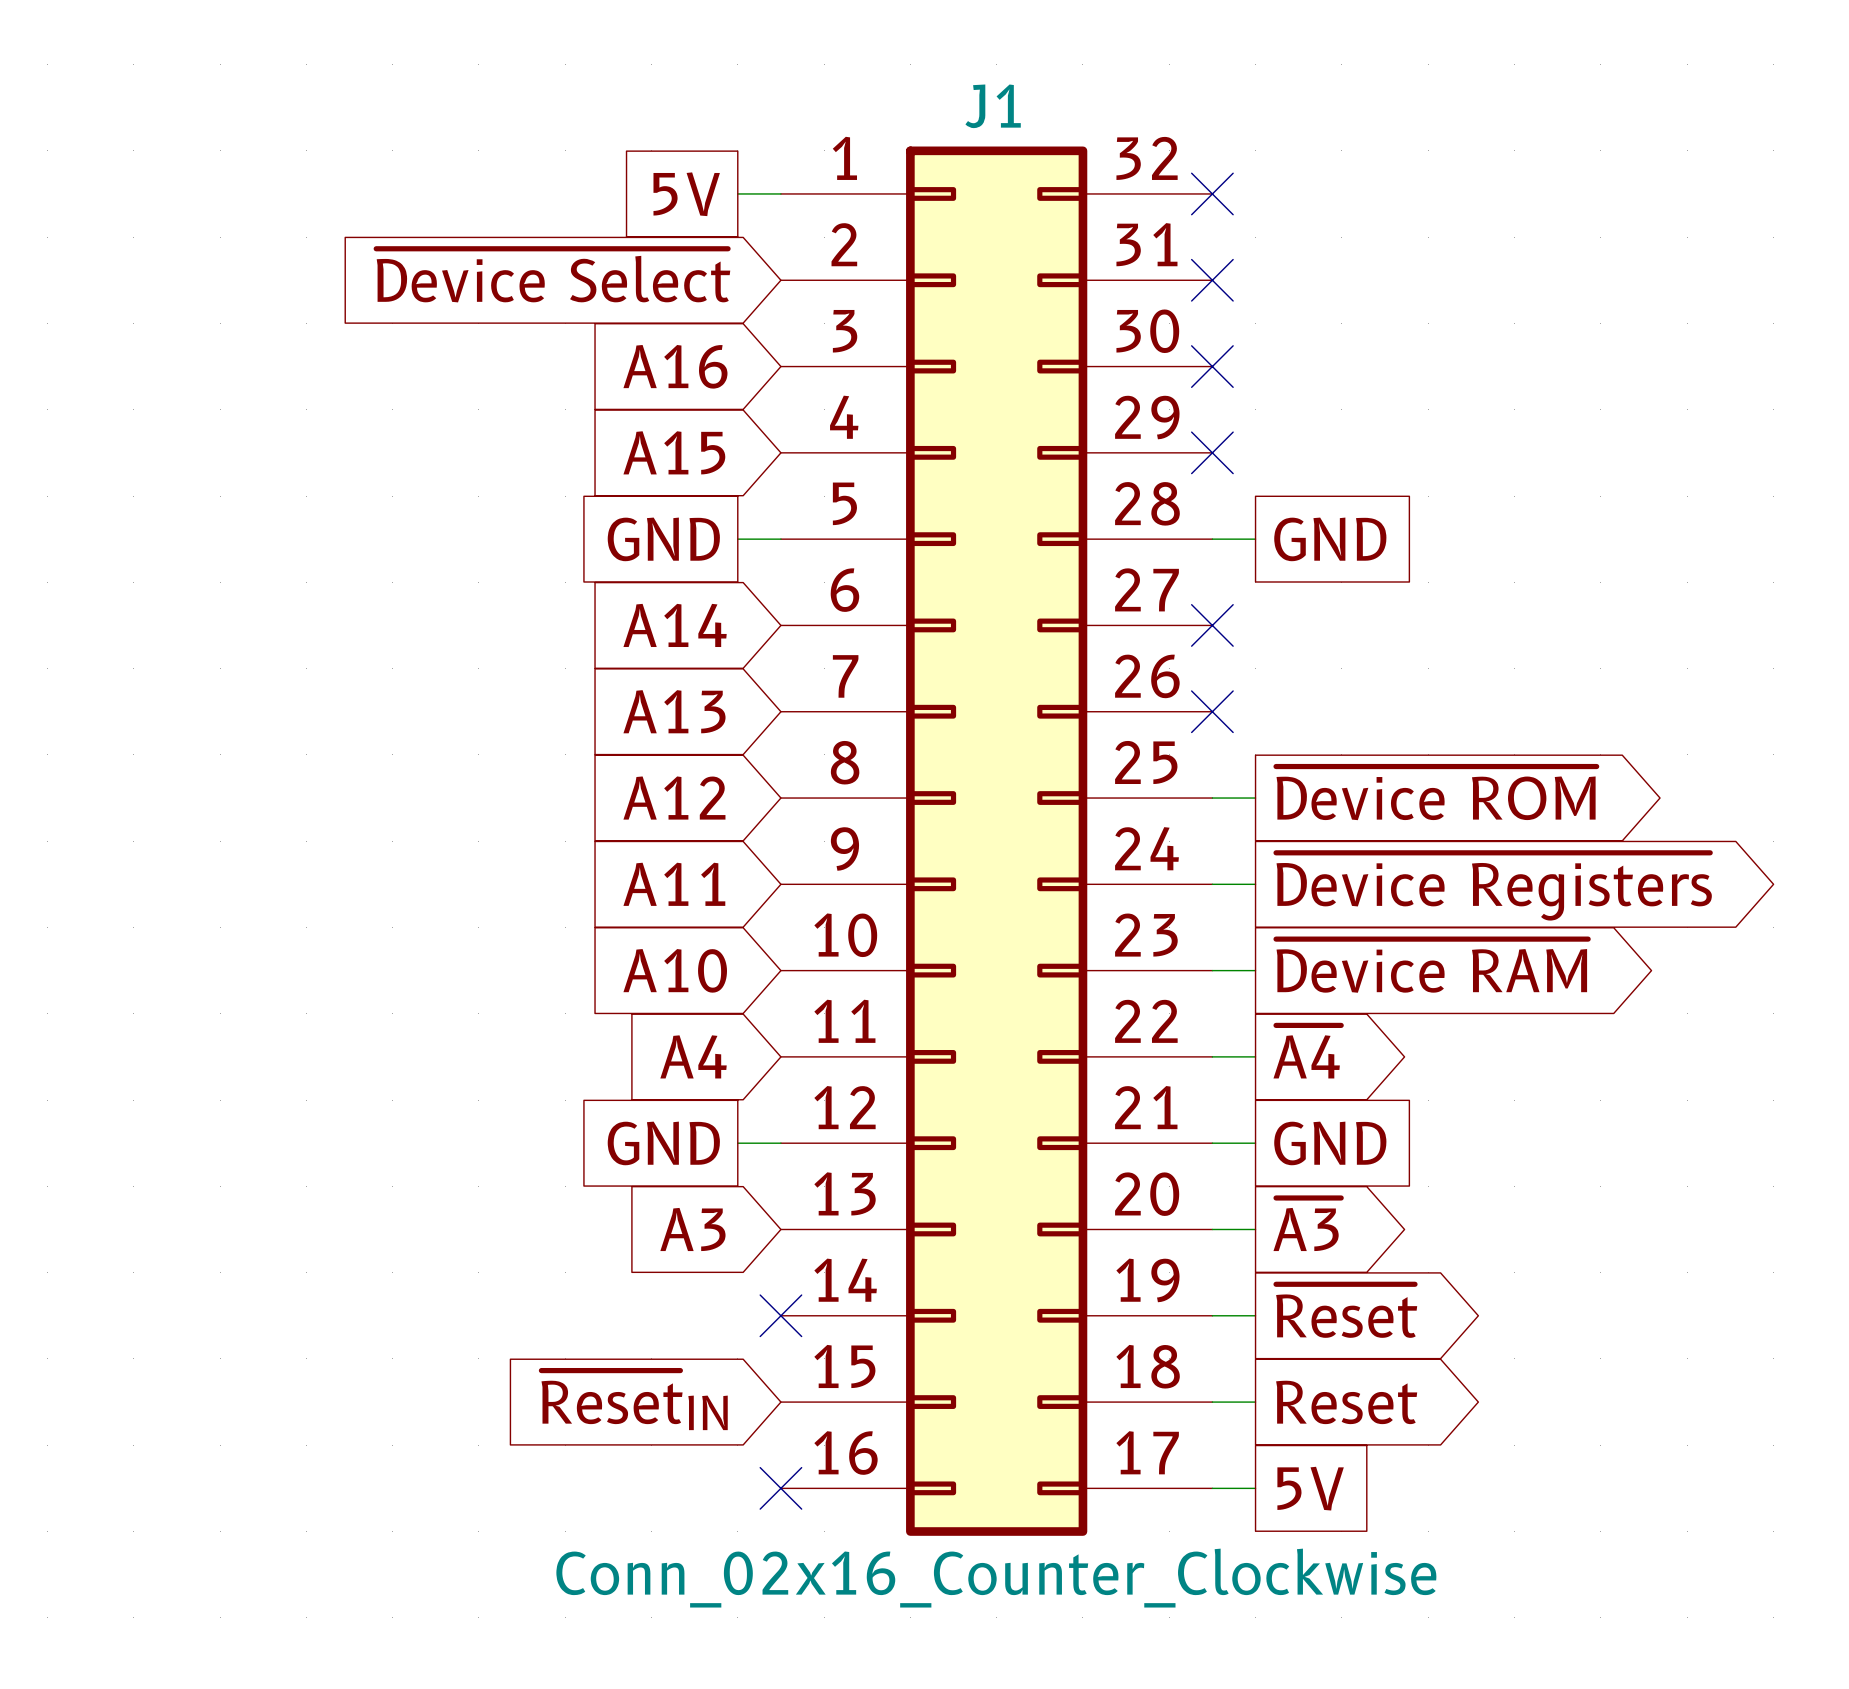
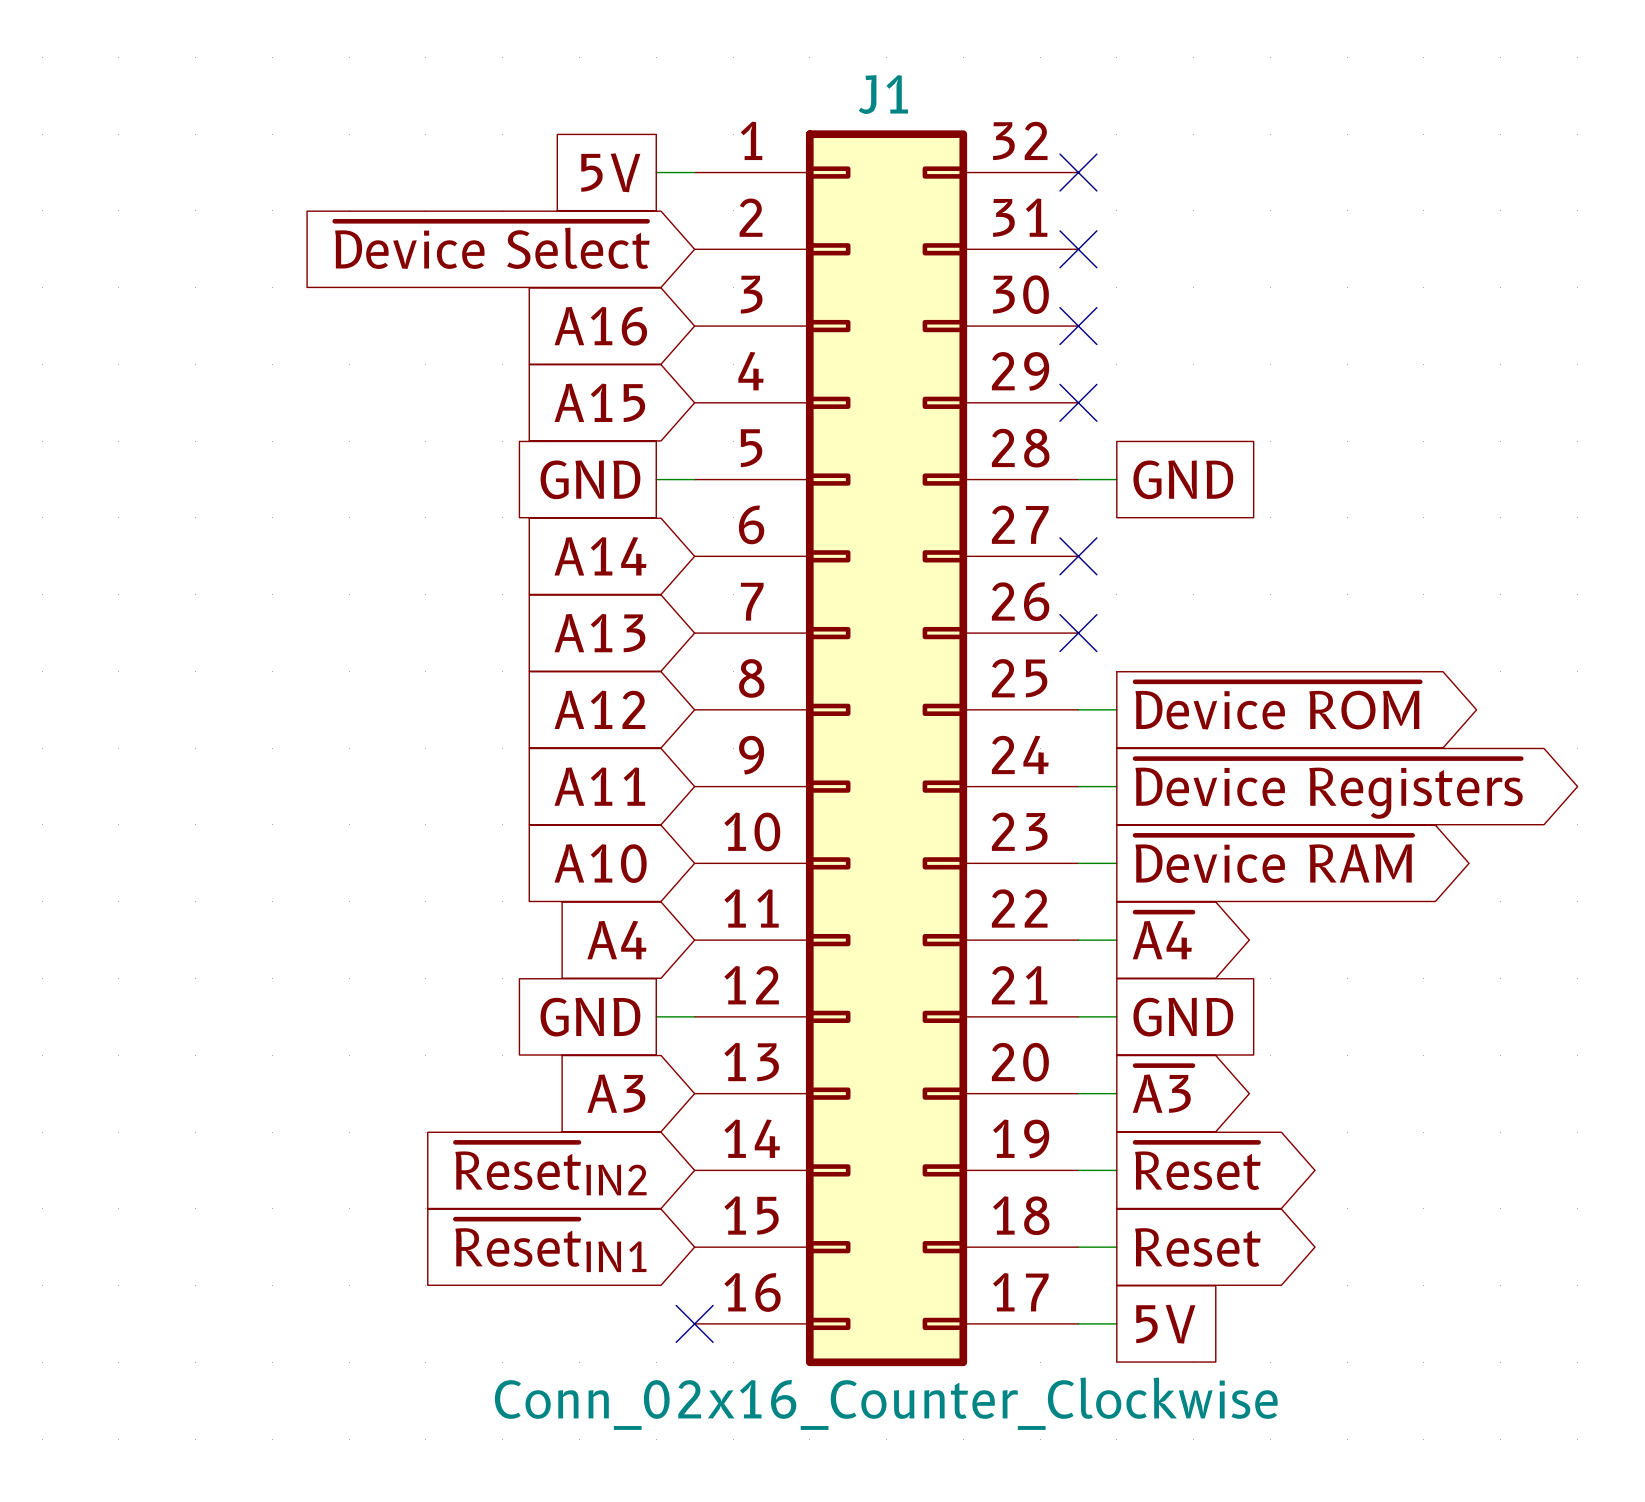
global label: none -> ~{Reset}IN2 (550, 1168)
no-connect mark: (780, 1315) -> none
global label: ~{Reset}IN (634, 1400) -> ~{Reset}IN1 (550, 1245)

